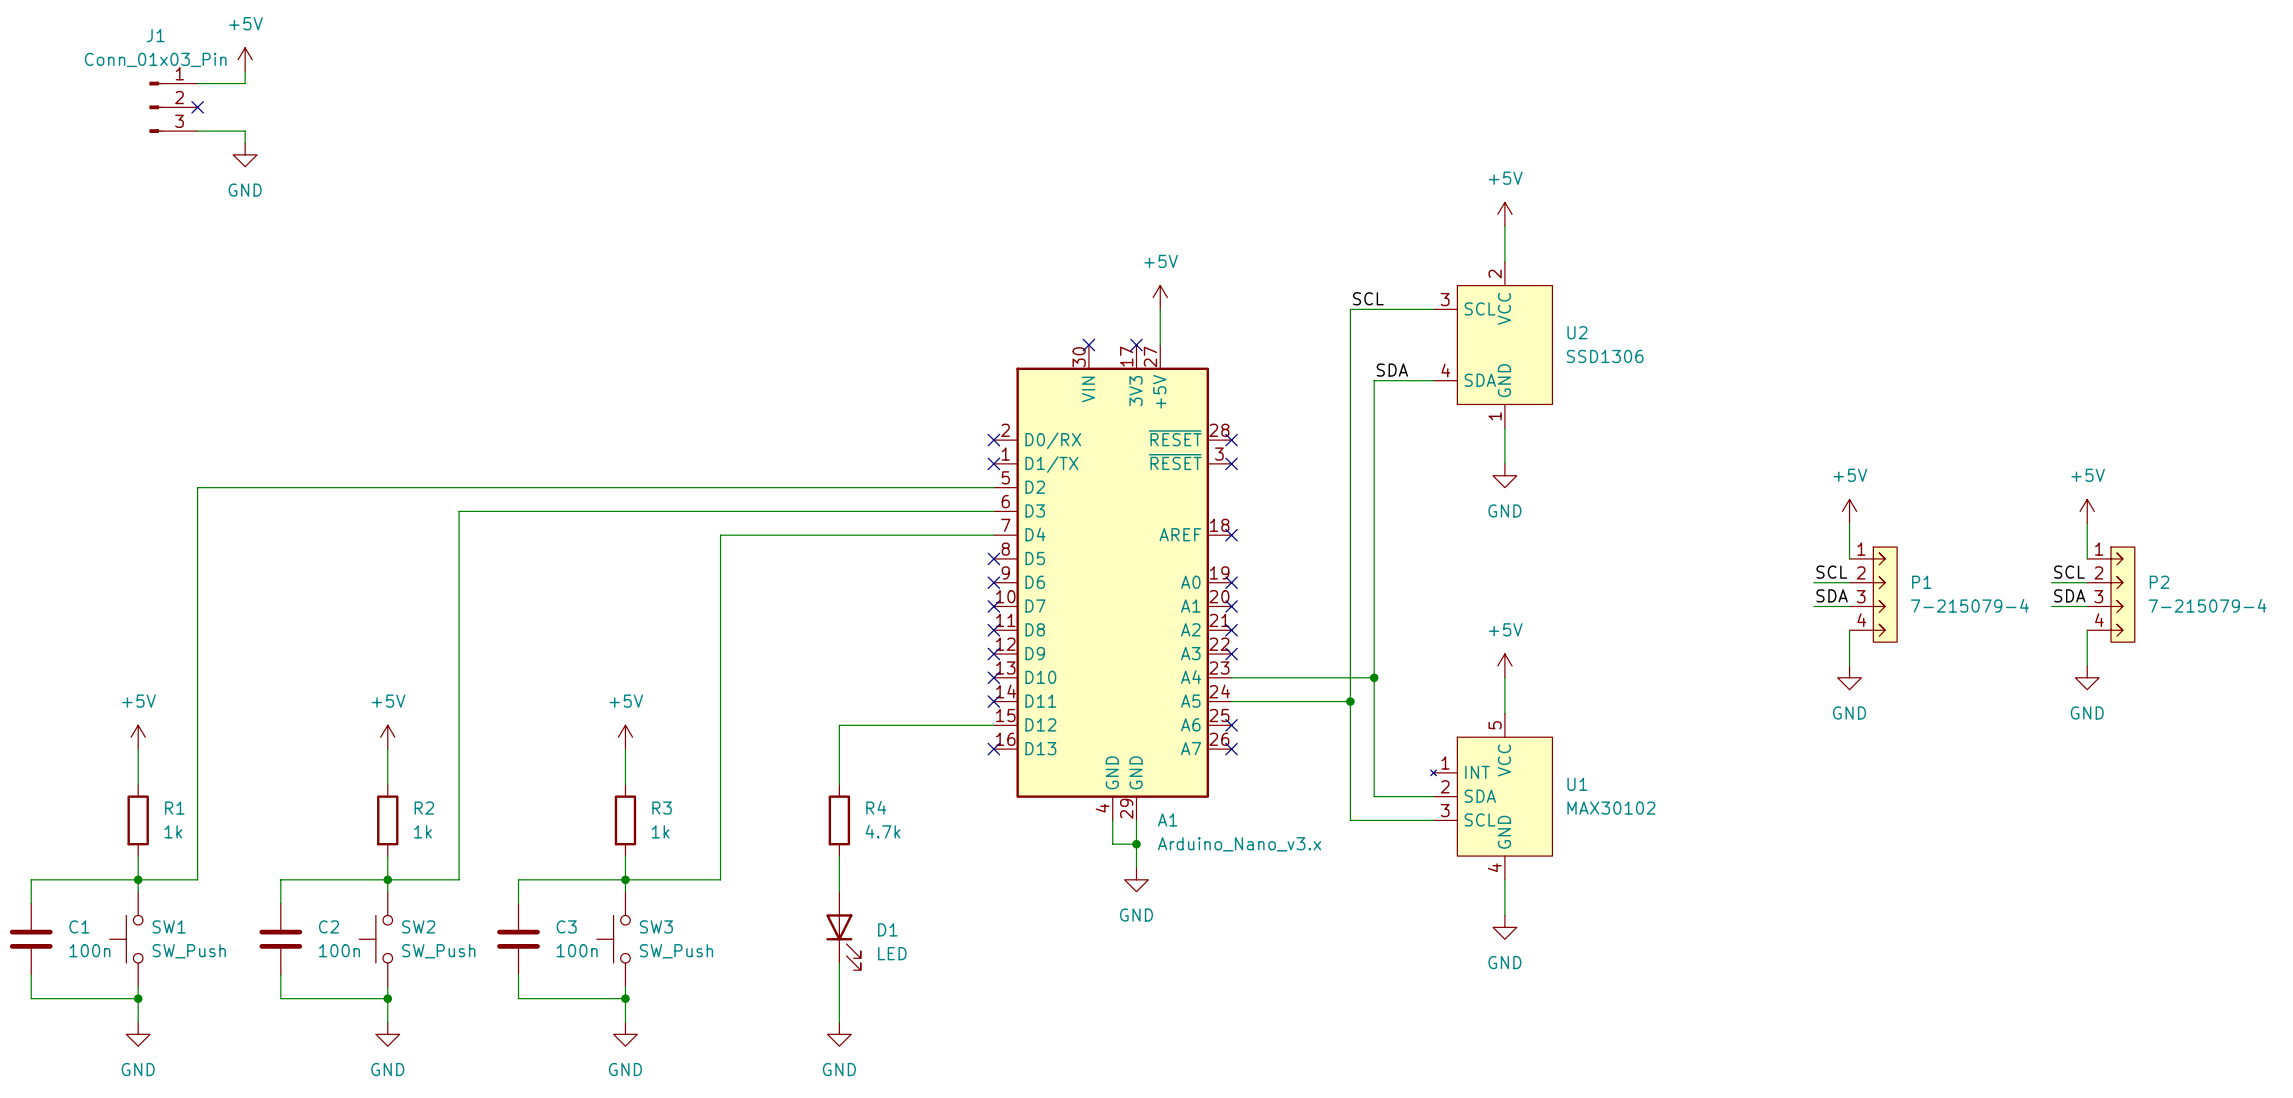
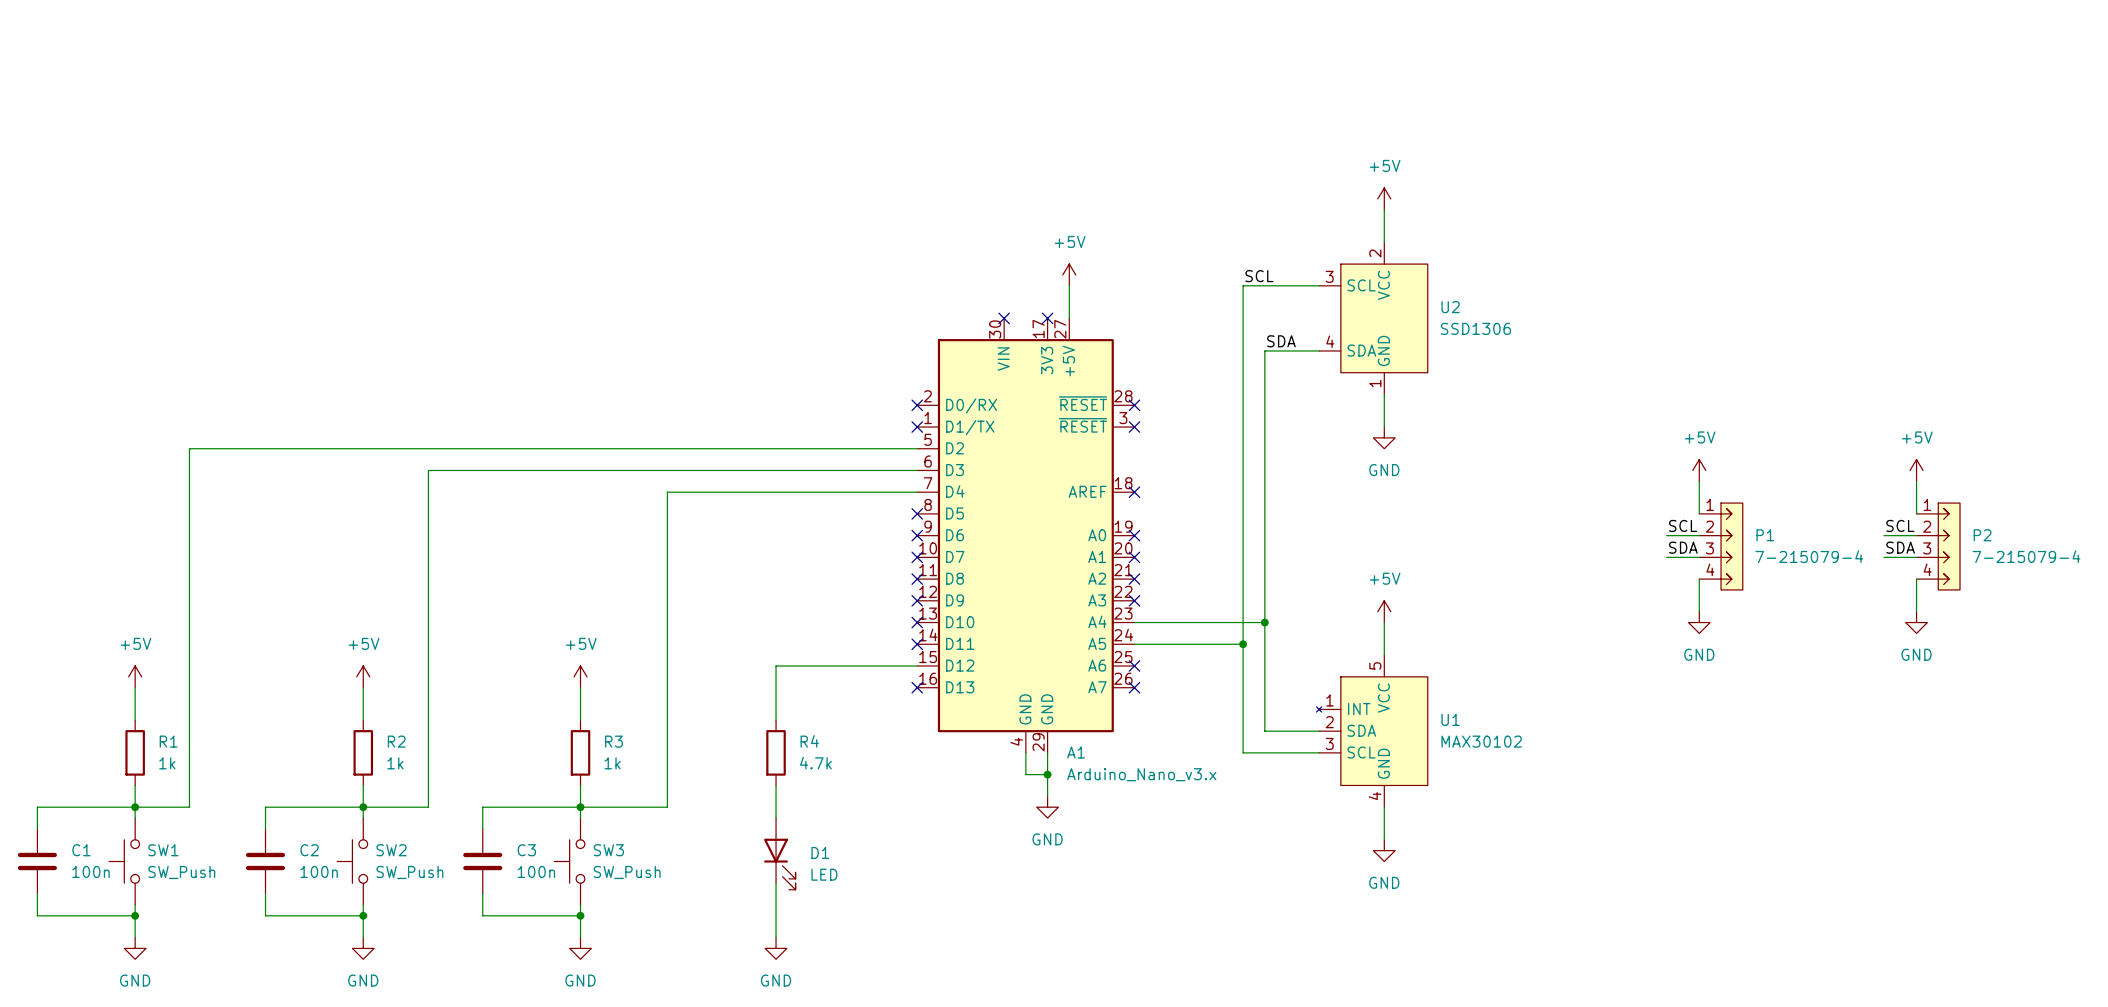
power symbol: +5V (245, 59) -> none
wire: (245, 71) (245, 83) (197, 83) -> none
J1: Conn_01x03_Pin (173, 107) -> none
no-connect mark: (197, 107) -> none
wire: (197, 131) (245, 131) (245, 142) -> none
power symbol: GND (245, 154) -> none

